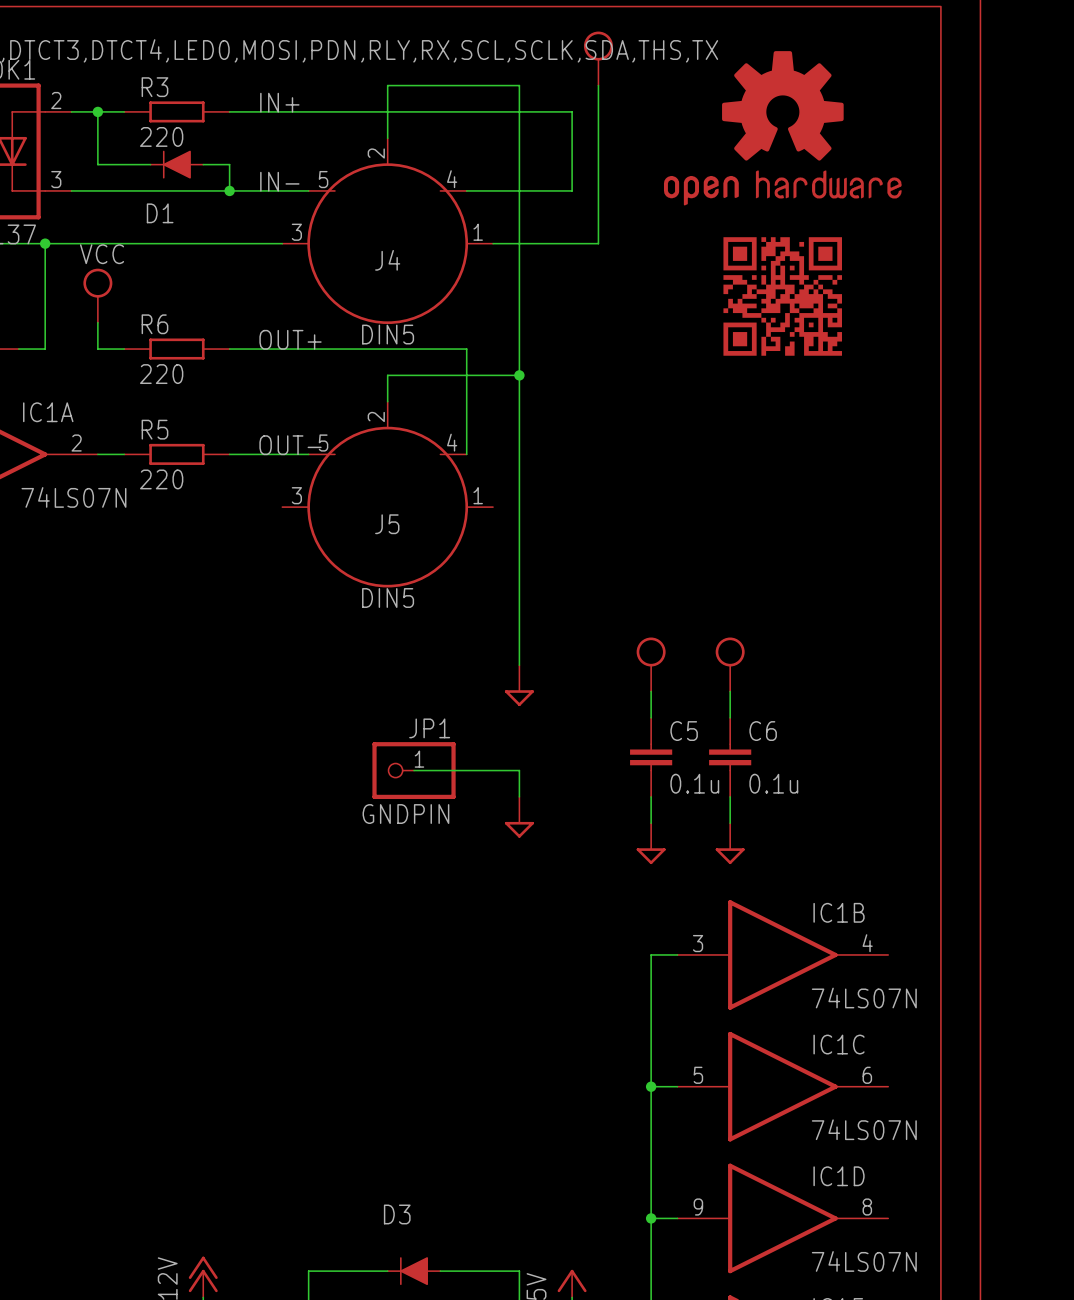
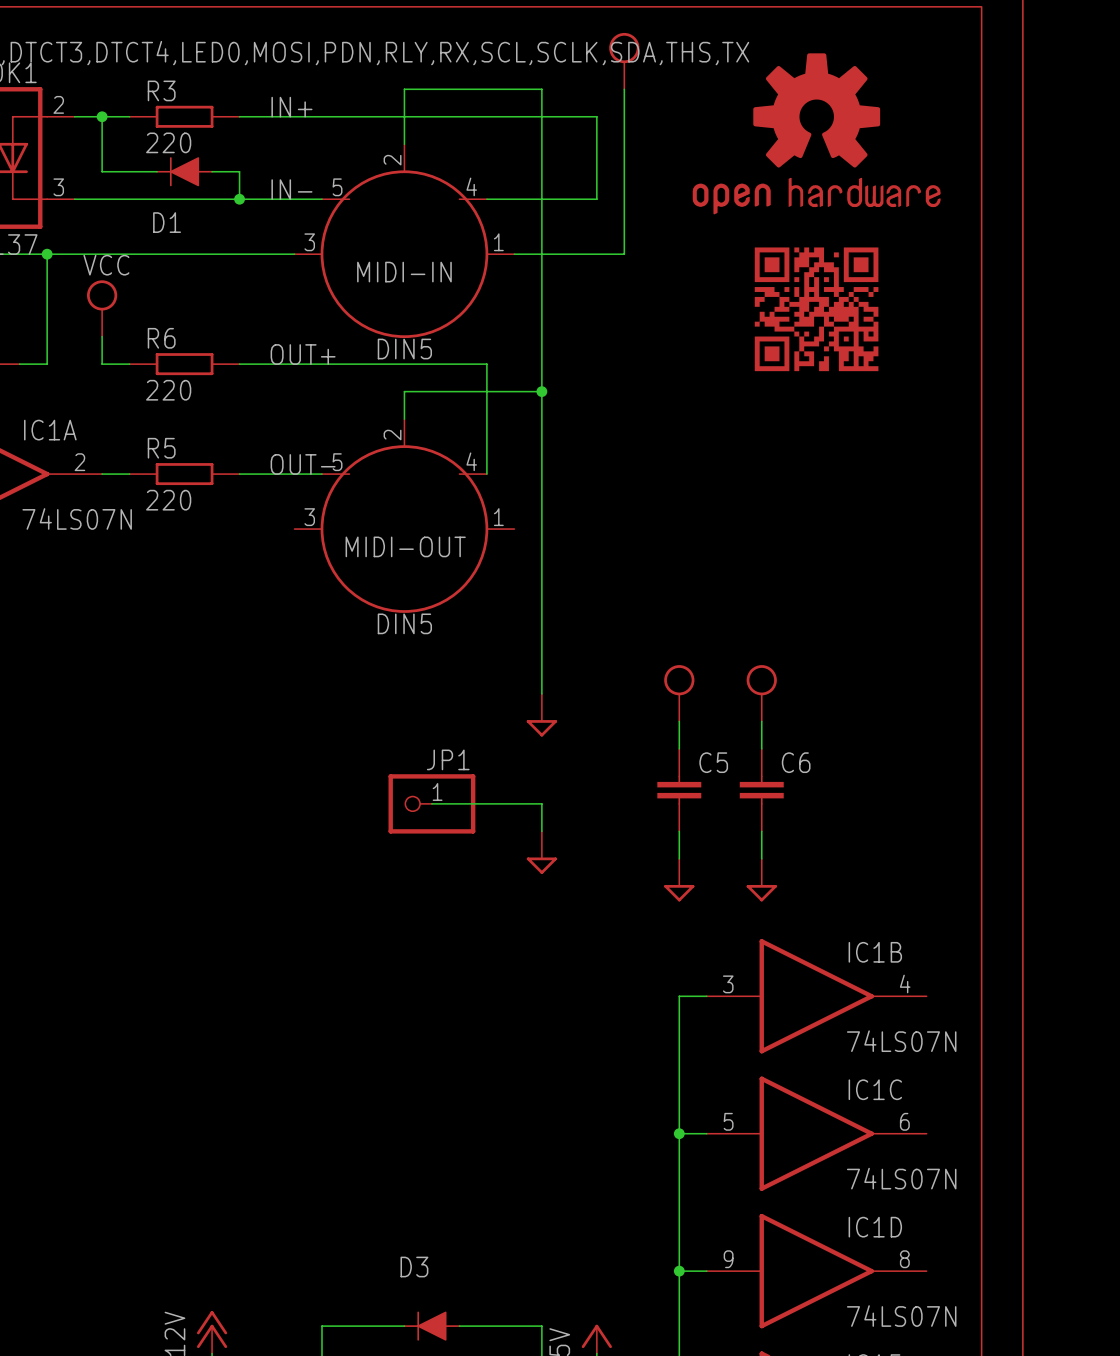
J4 name: J4 (387, 260) -> MIDI-IN (404, 272)
J5 name: J5 (387, 524) -> MIDI-OUT (405, 546)
C5 value: 0.1u (694, 783) -> none
C6 value: 0.1u (773, 783) -> none
JP1 value: GNDPIN (405, 814) -> none

